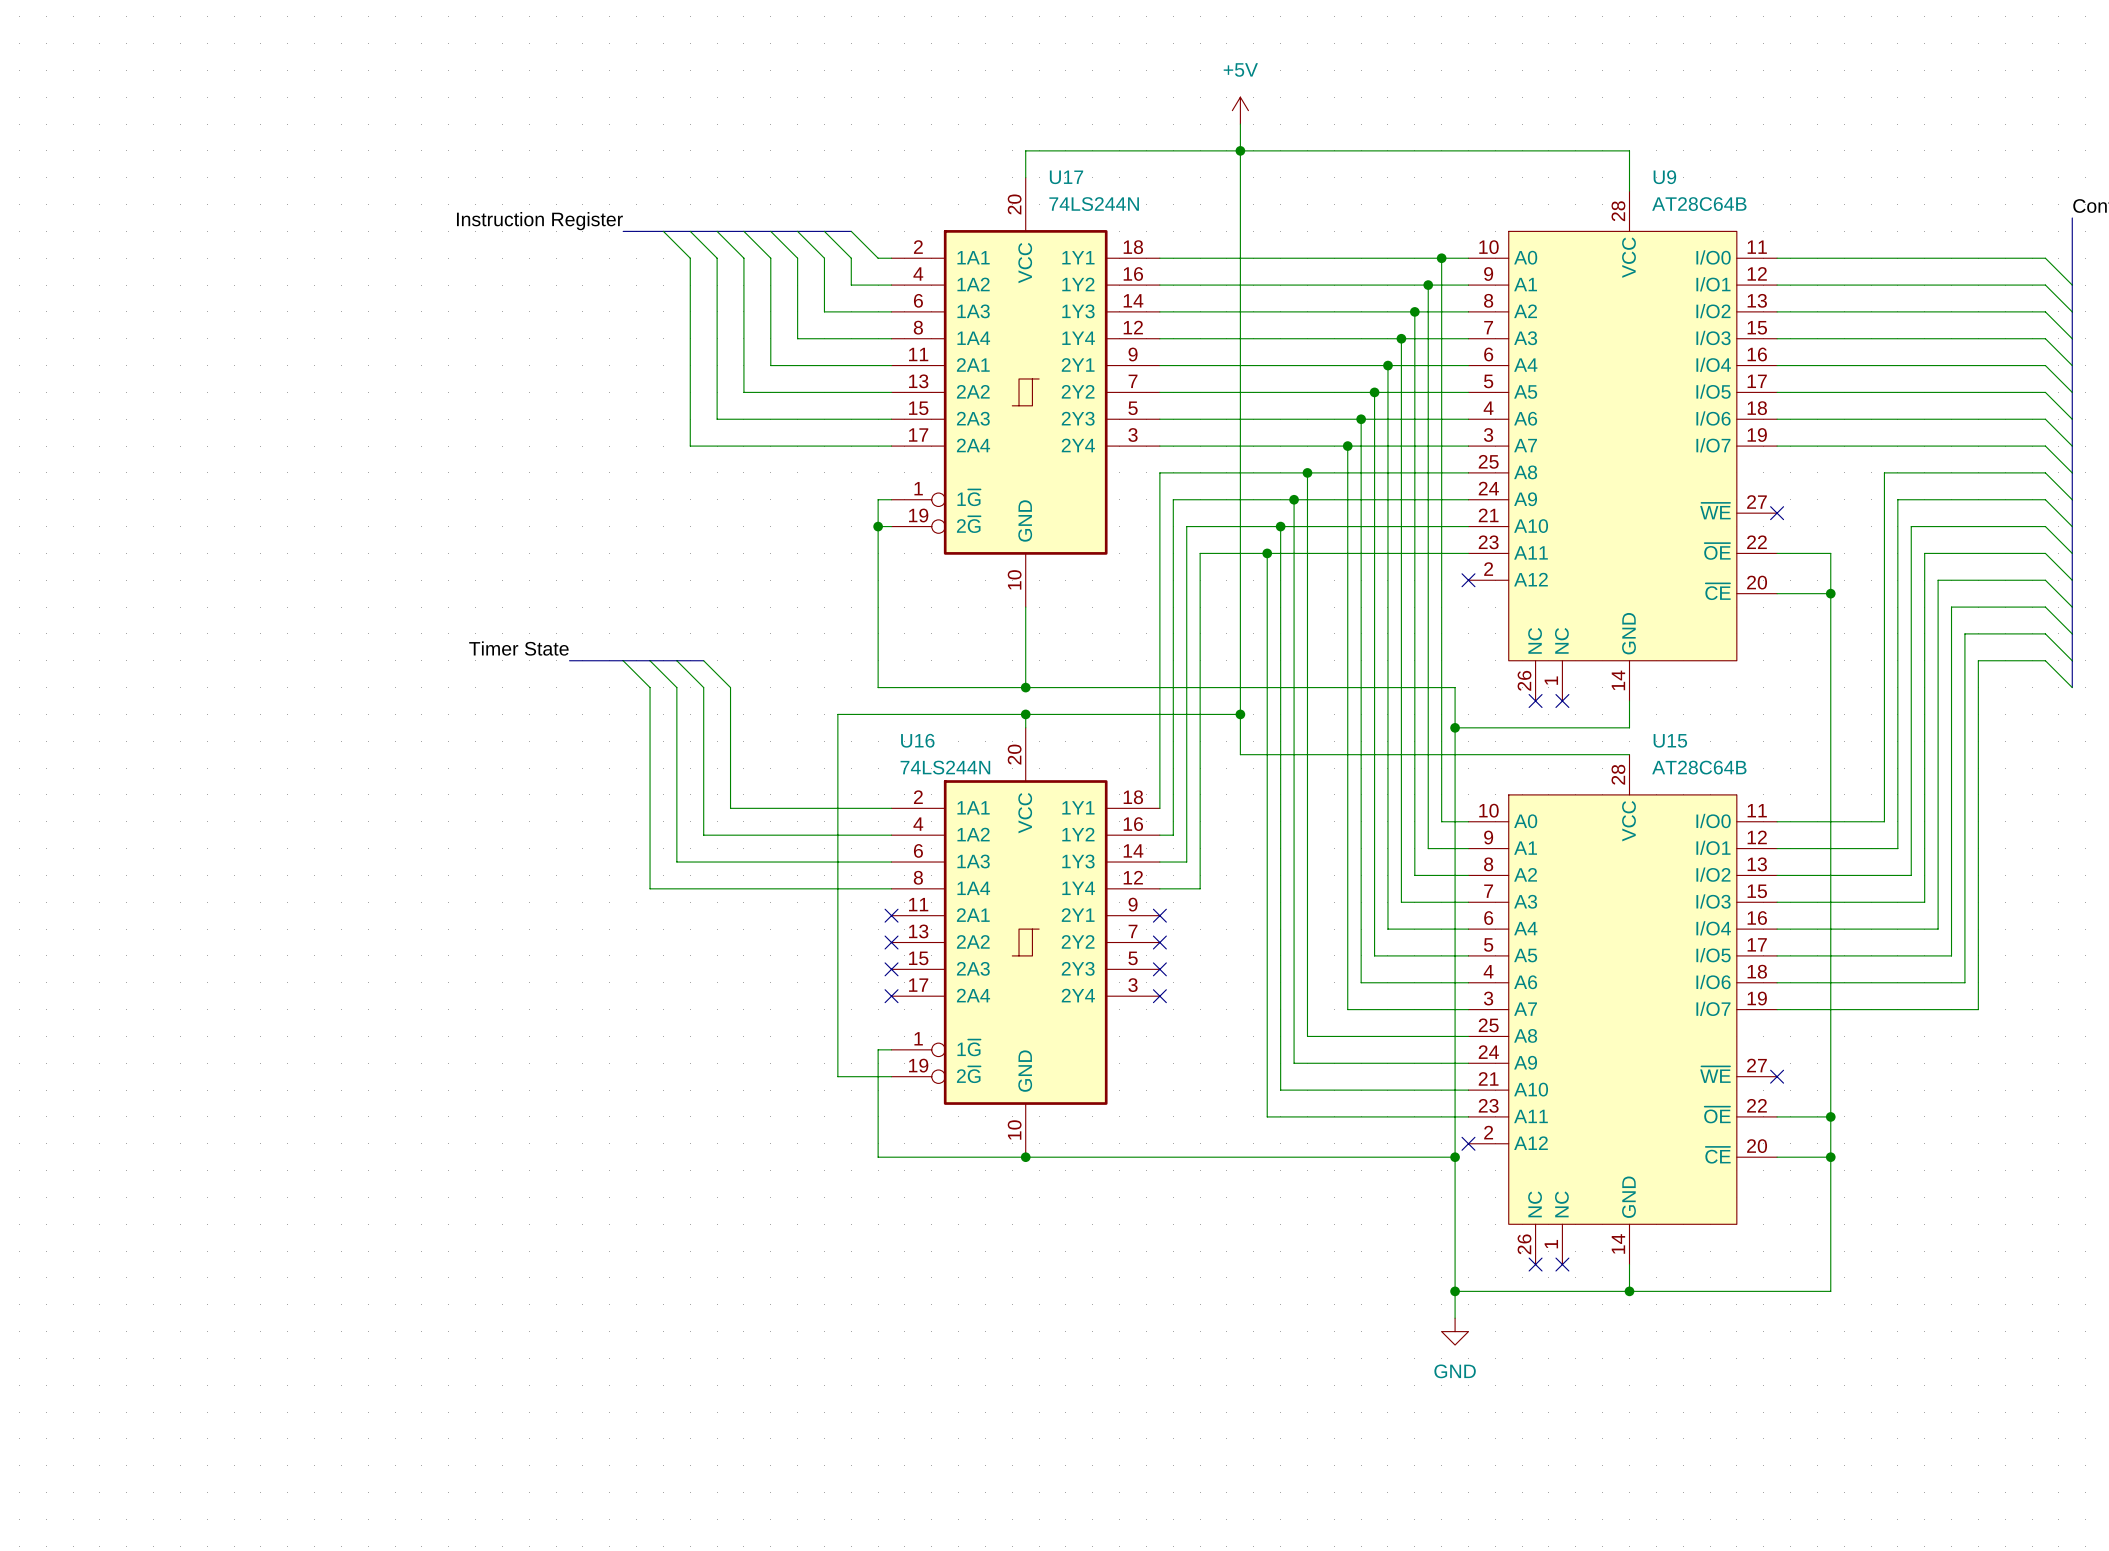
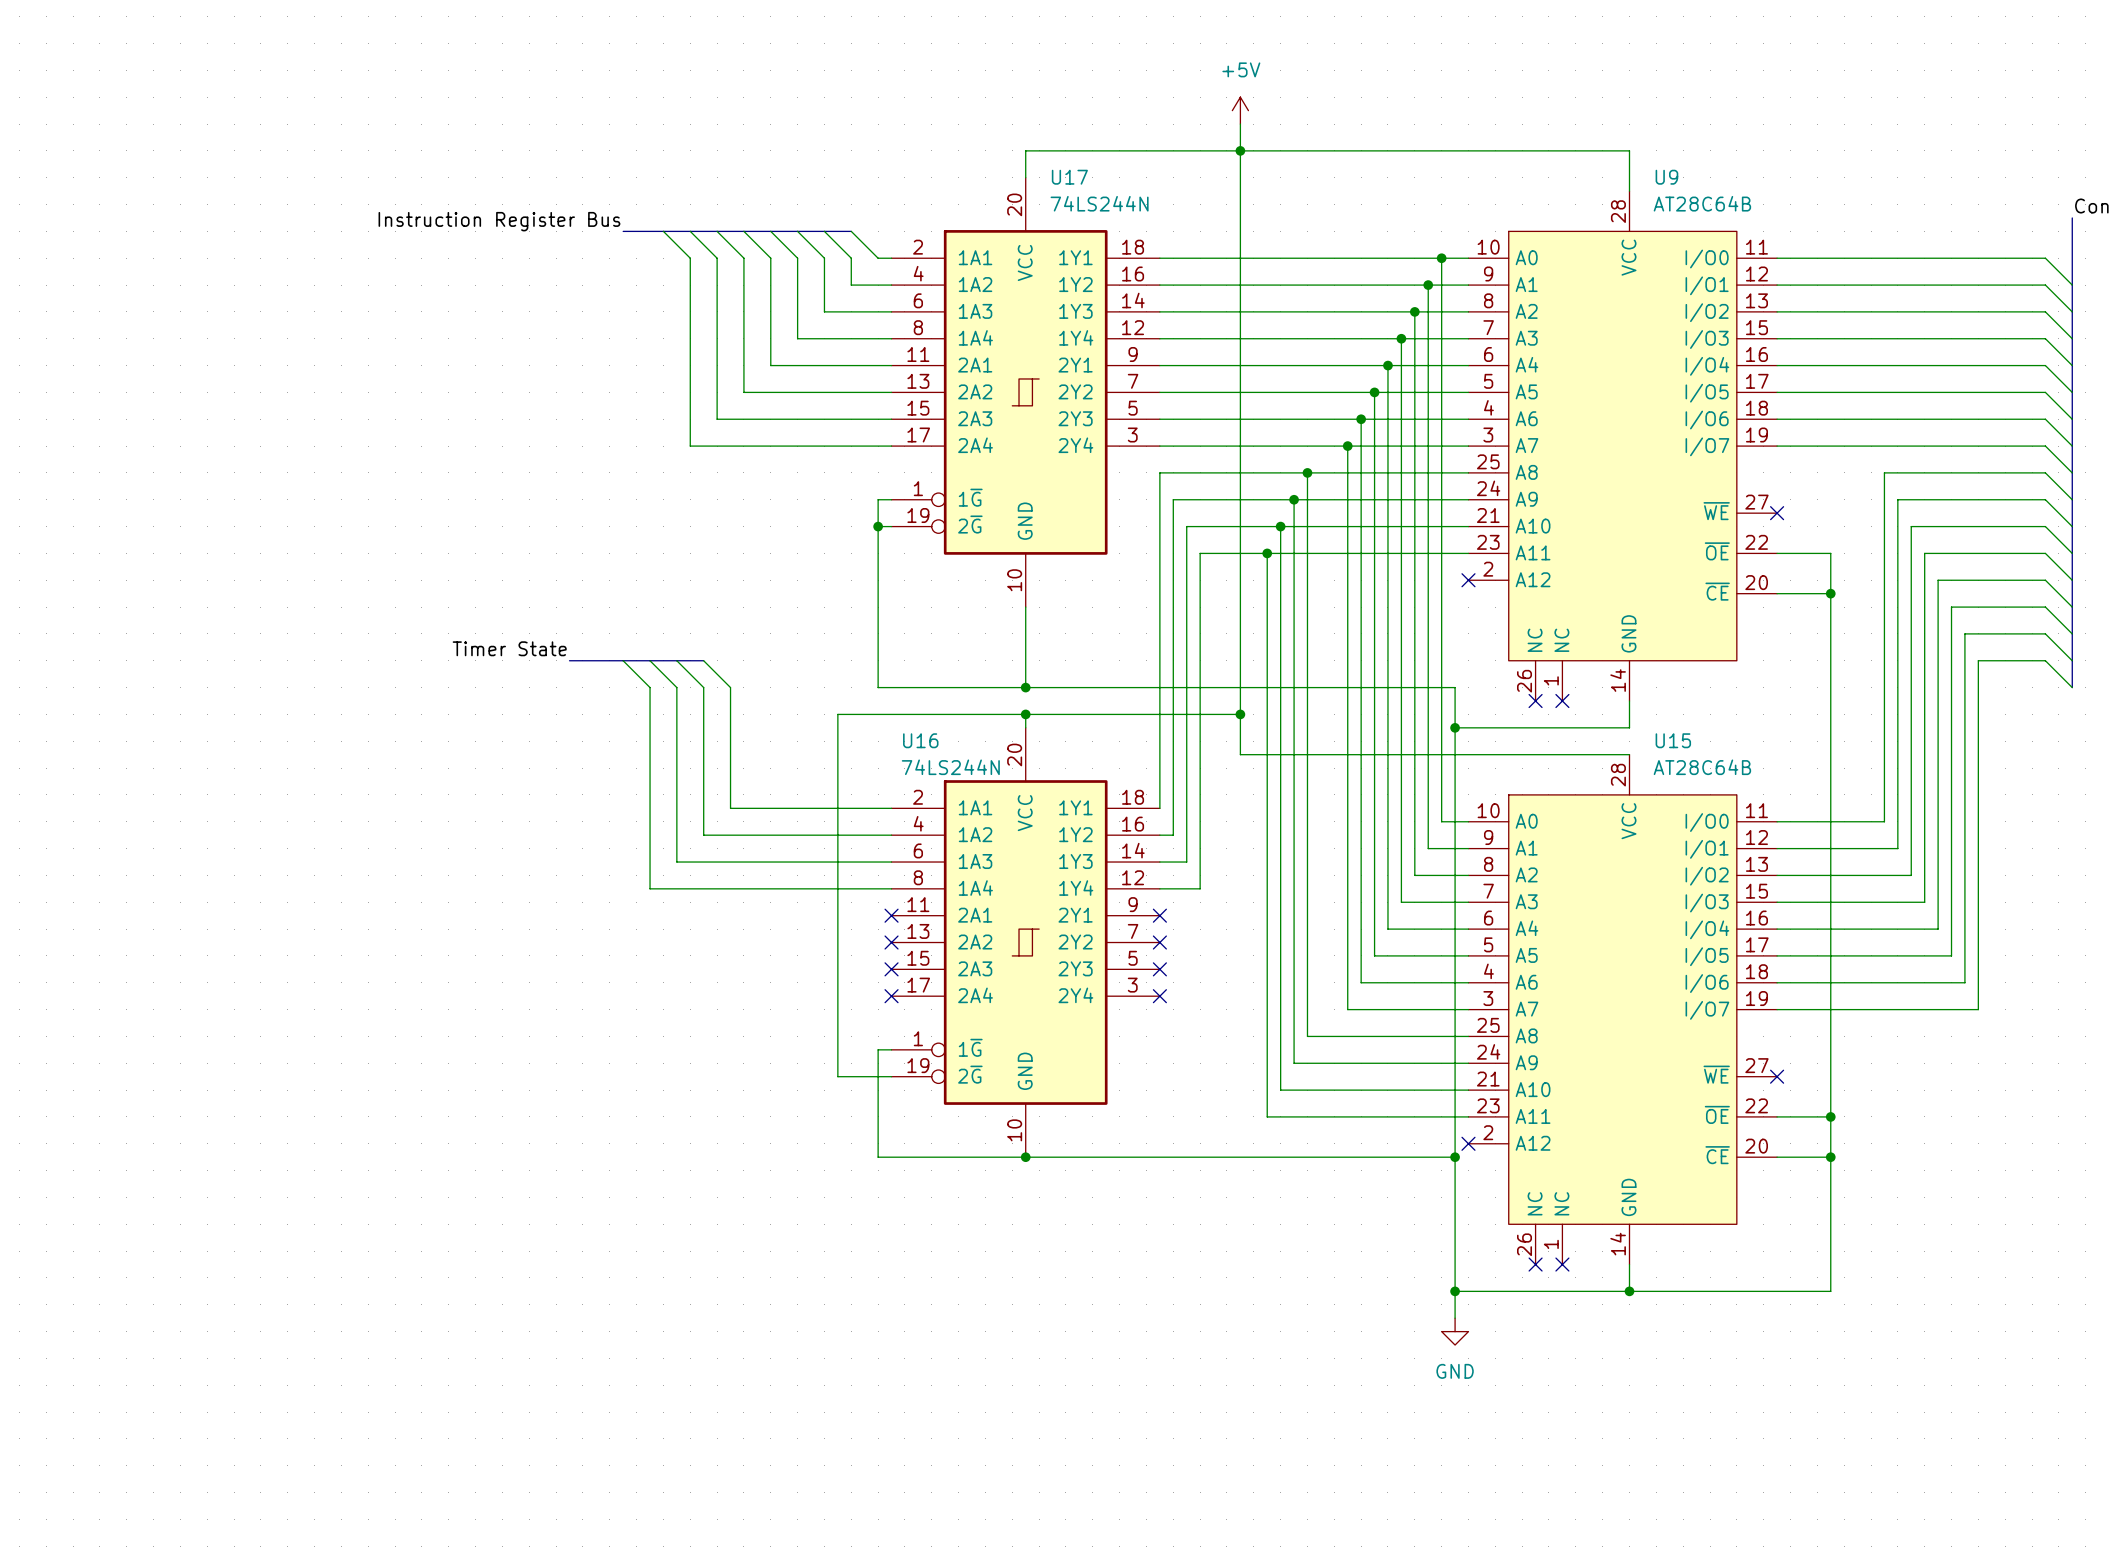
label: Instruction Register (539, 221) -> Instruction Register Bus (499, 221)

